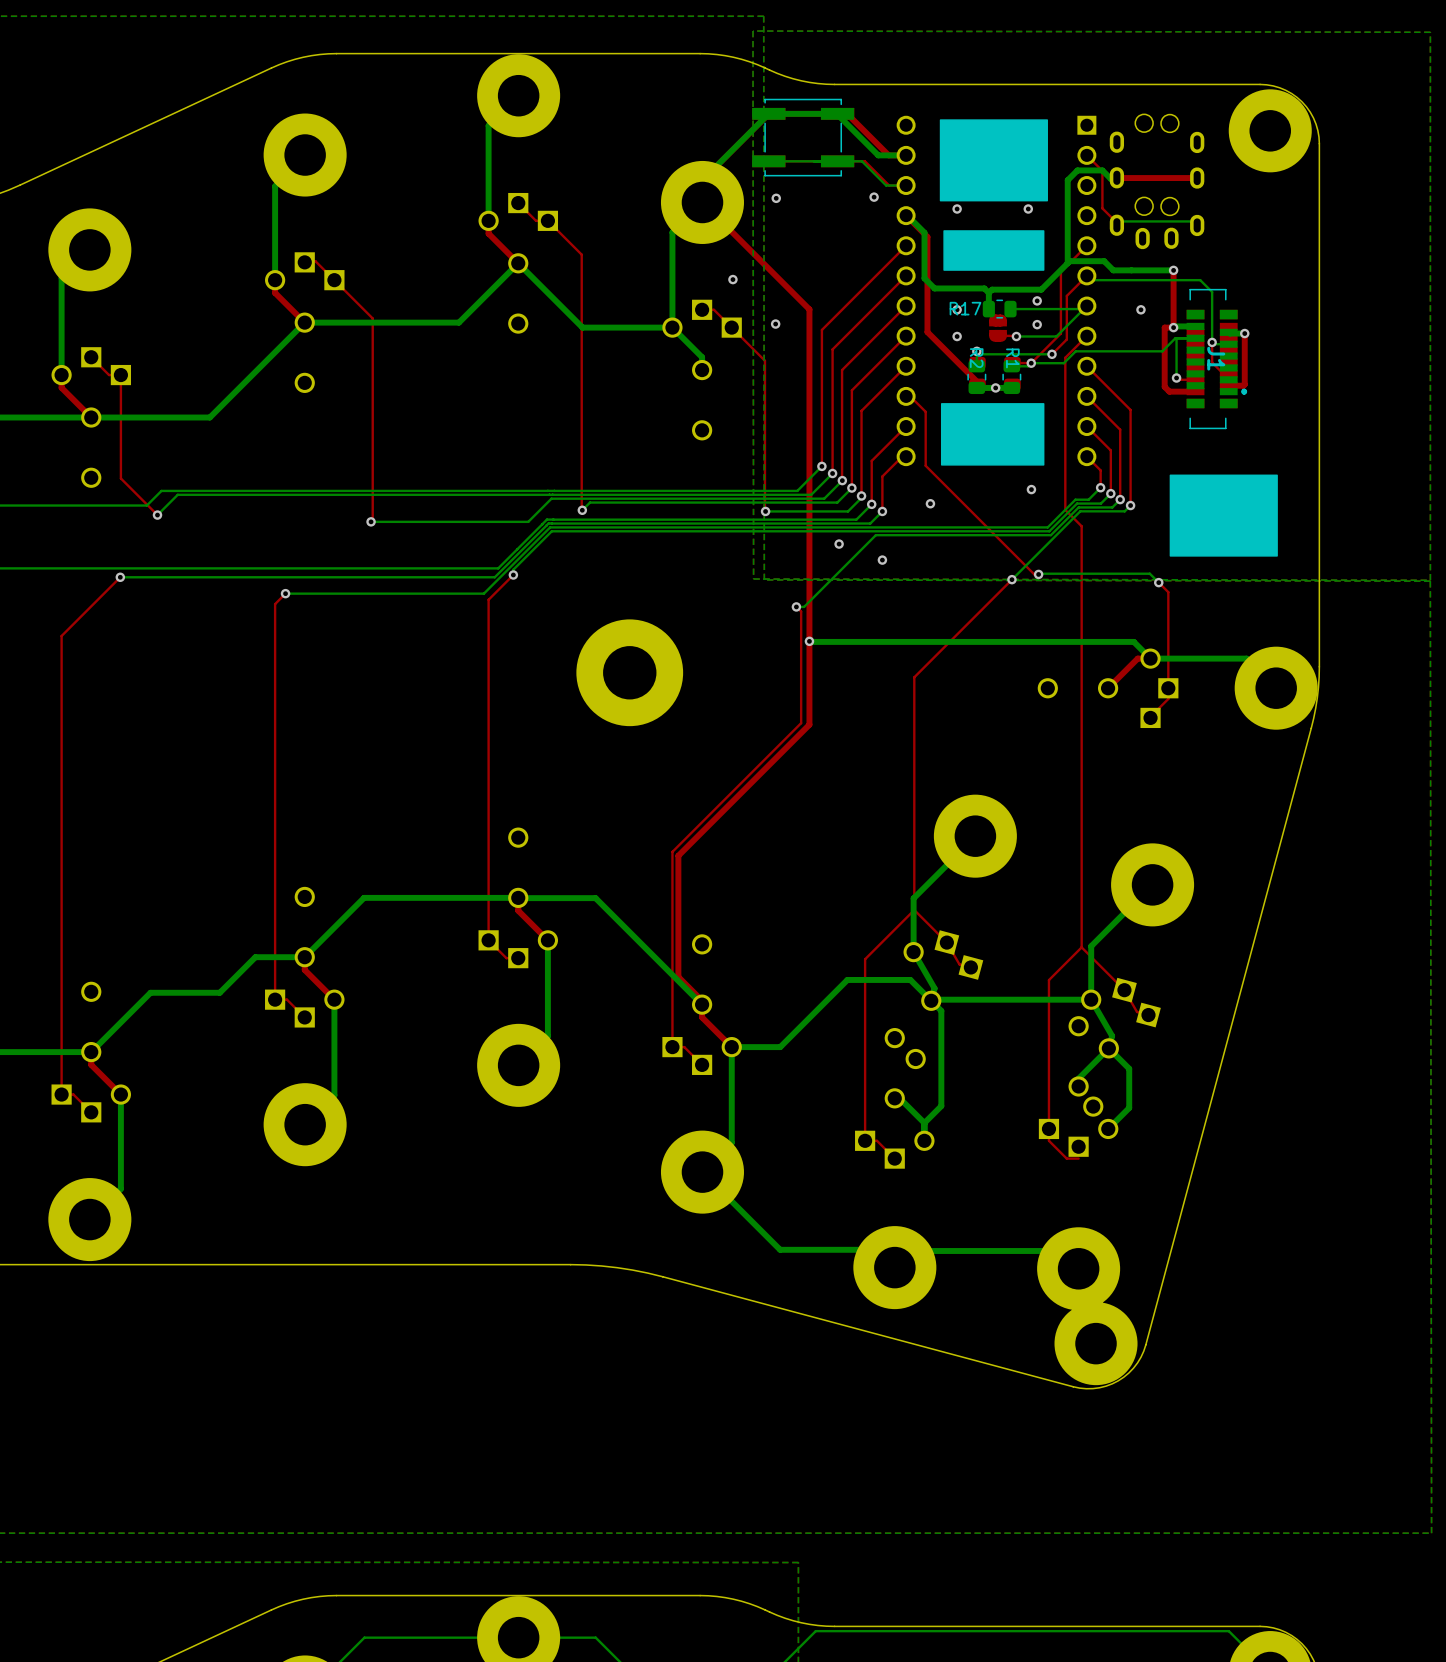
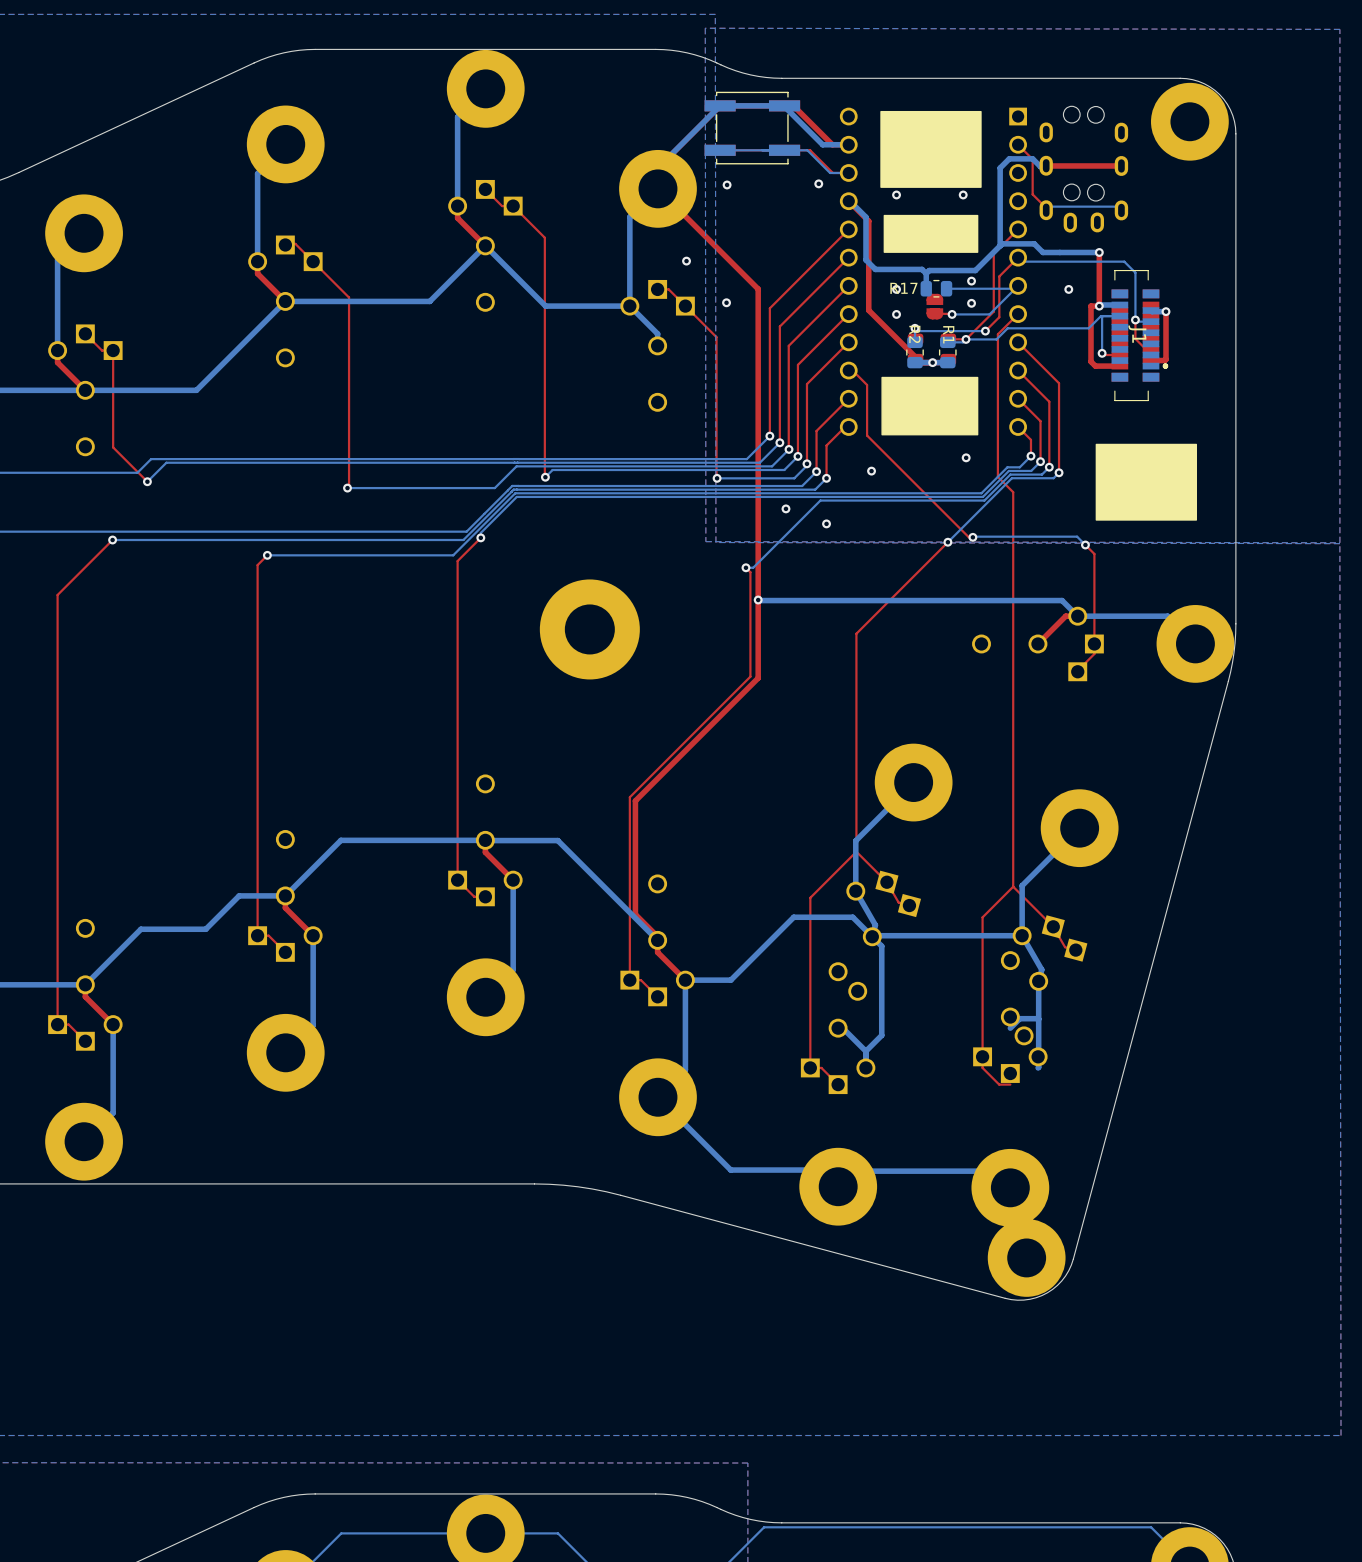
bottom track: none -> (1038, 981) (1038, 1067)
bottom track: (1078, 1086) (1078, 1078) (1108, 1048) (1129, 1068) (1129, 1107) (1108, 1128) -> none
bottom track: none -> (1038, 1019) (1019, 1018) (1010, 1028)

